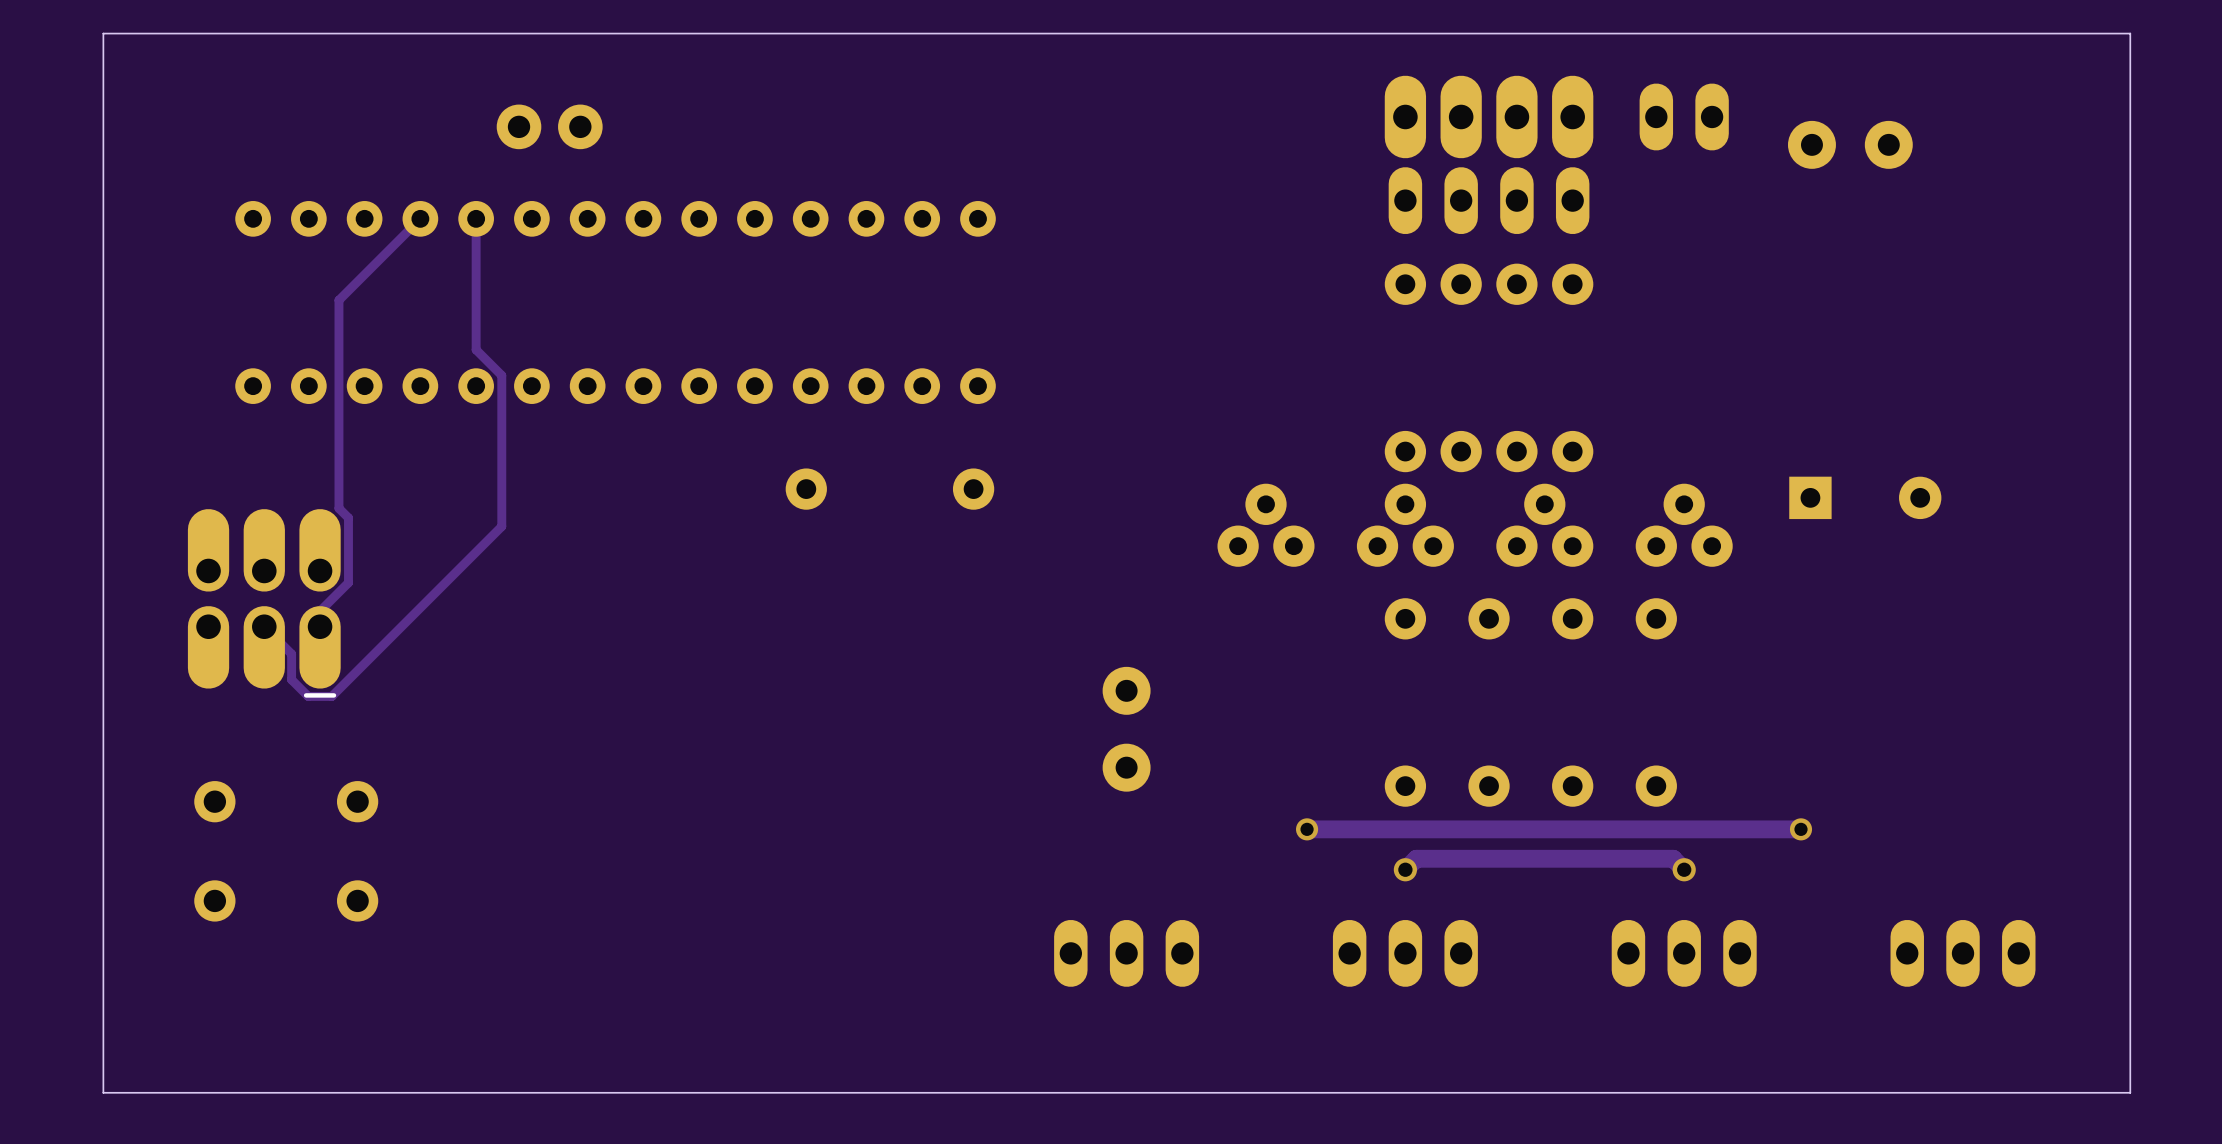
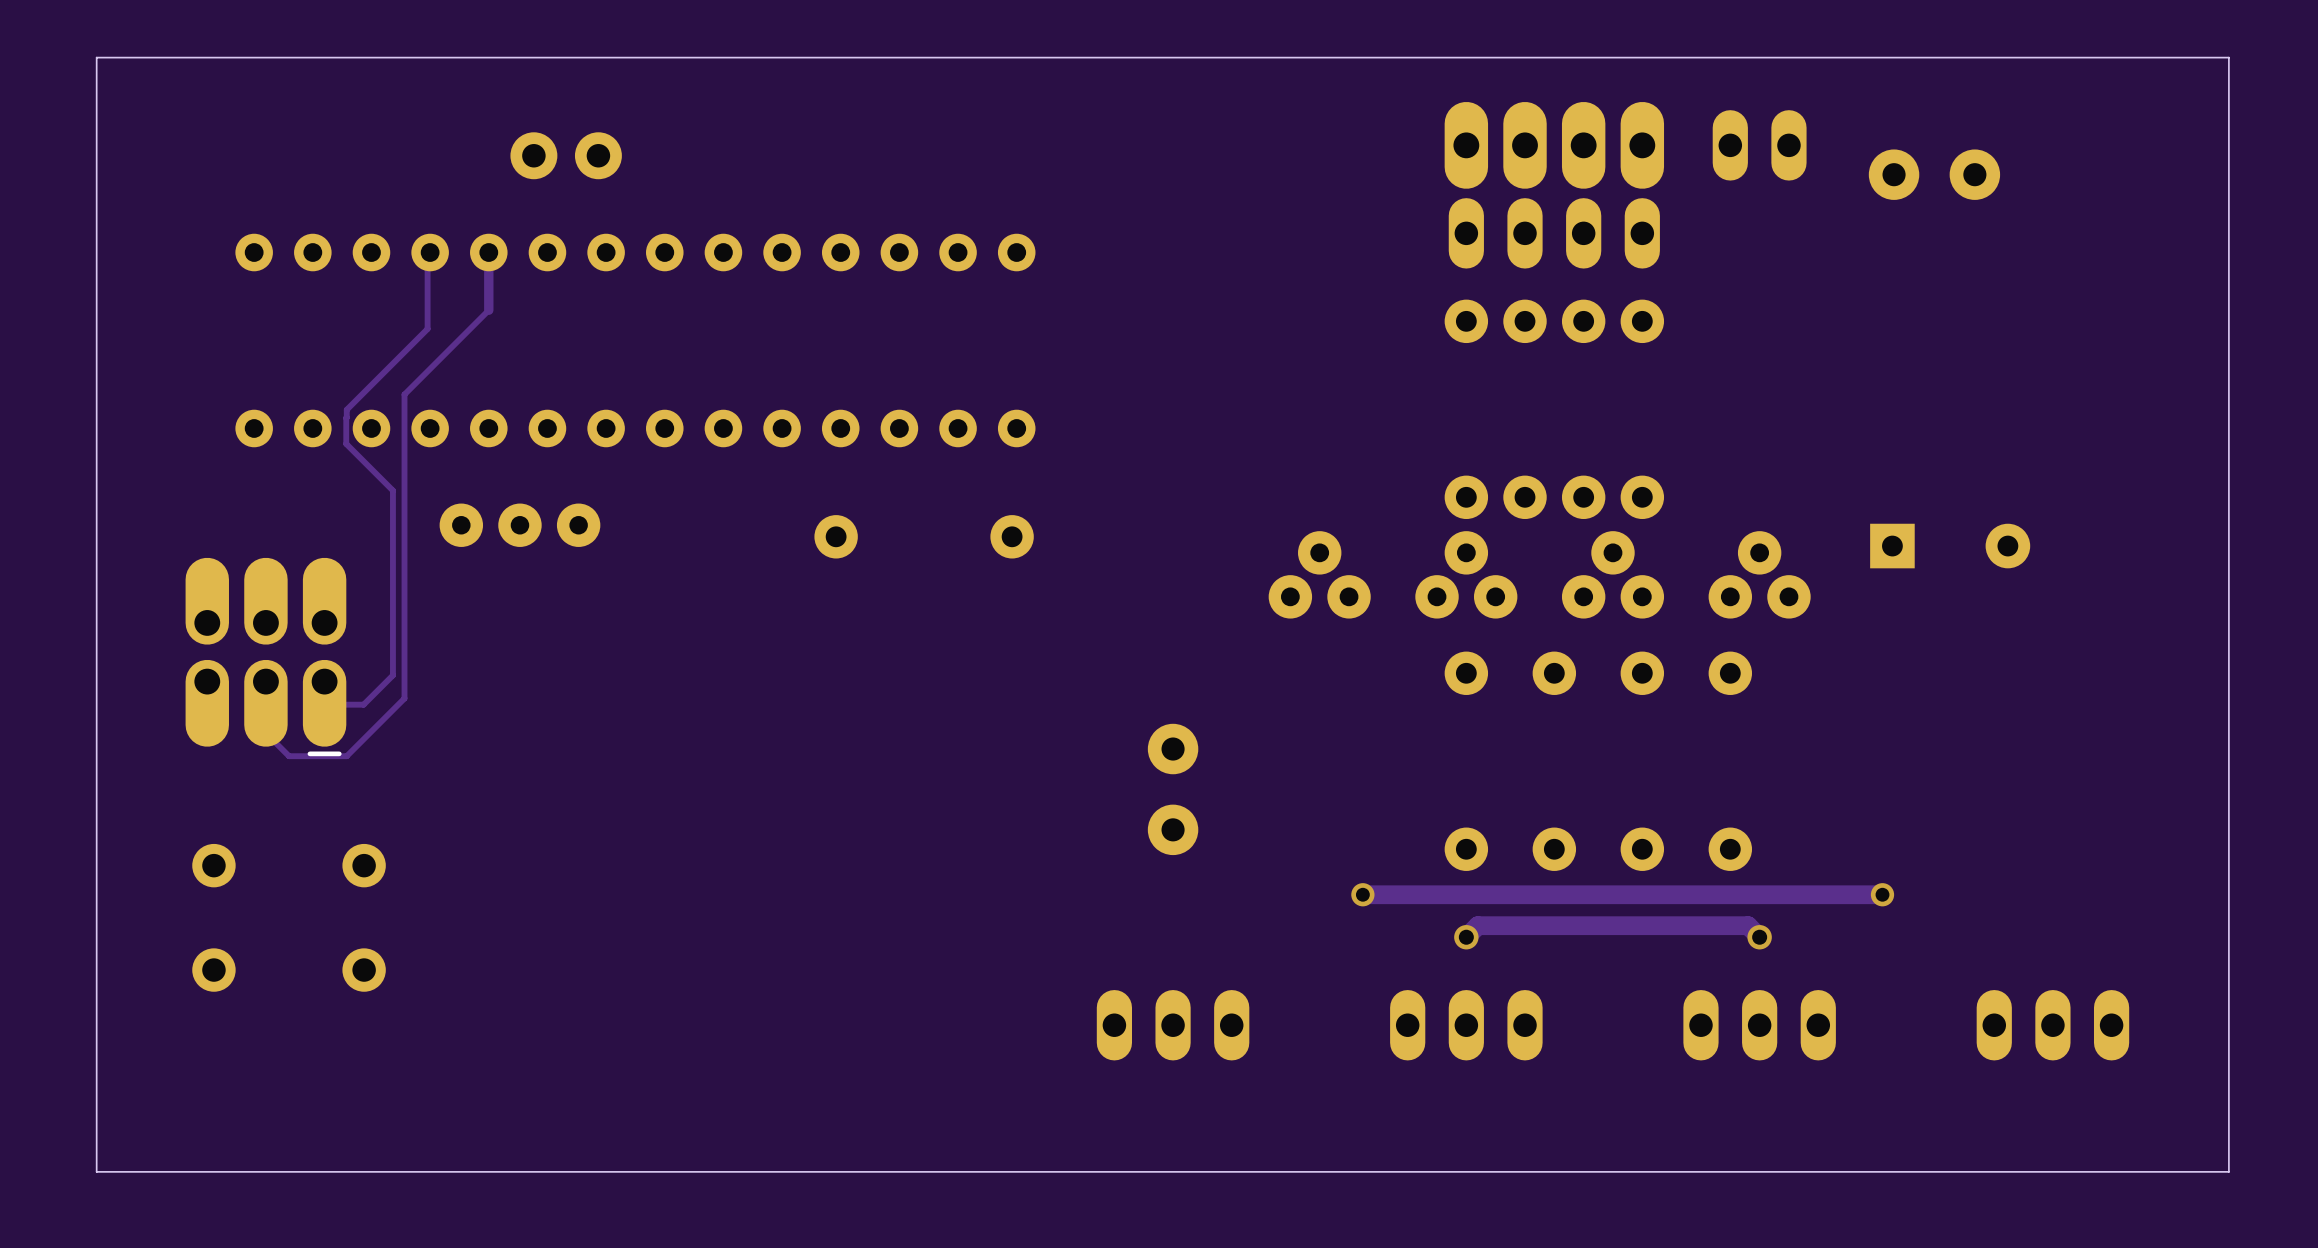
track: (417, 221) (338, 300) (338, 508) (348, 517) (348, 582) (320, 611) (320, 626) -> (427, 255) (427, 328) (346, 409) (346, 443) (392, 490) (392, 675) (363, 704) (324, 704) (324, 681)
track: (476, 273) (476, 349) (501, 375) (501, 526) (331, 696) (308, 696) (291, 679) (291, 654) (264, 626) -> (488, 310) (404, 394) (404, 698) (346, 756) (289, 756) (265, 733) (265, 681)
part: none -> (519, 525)

